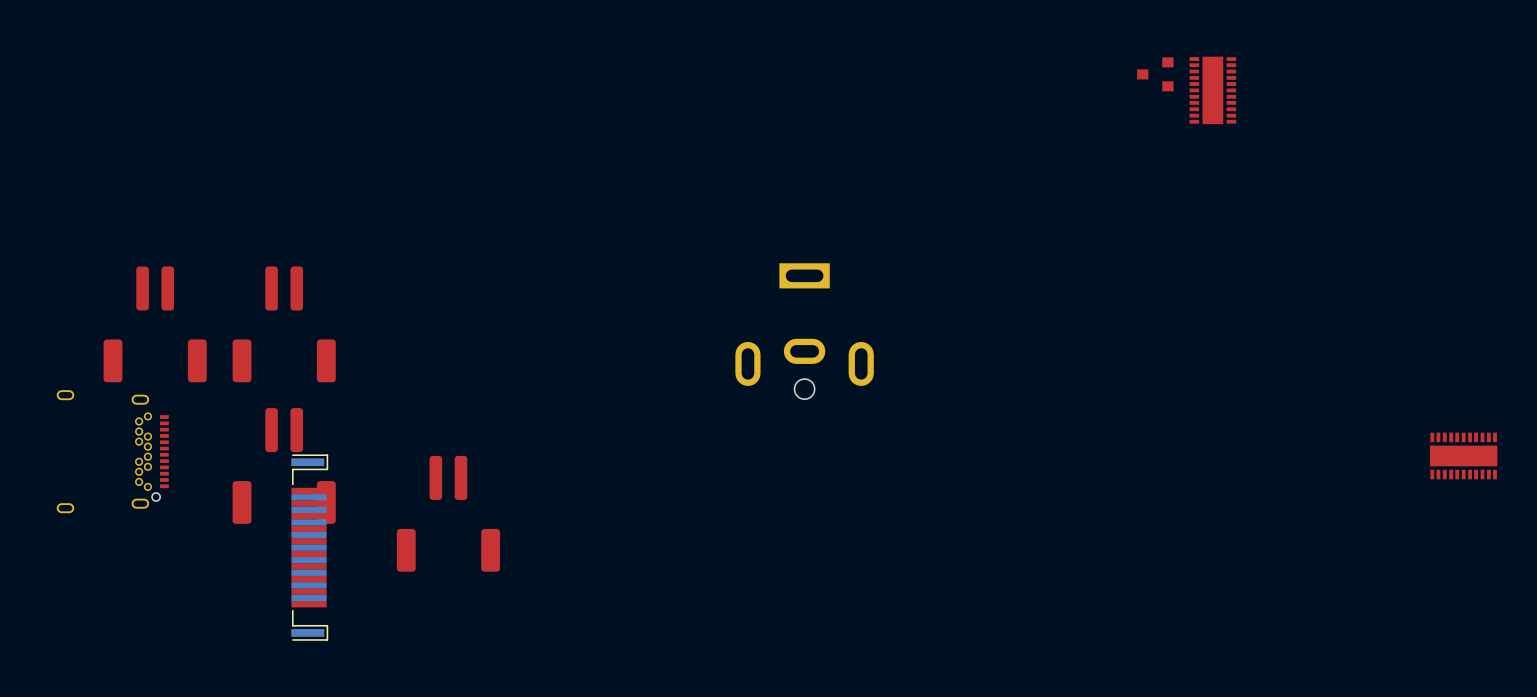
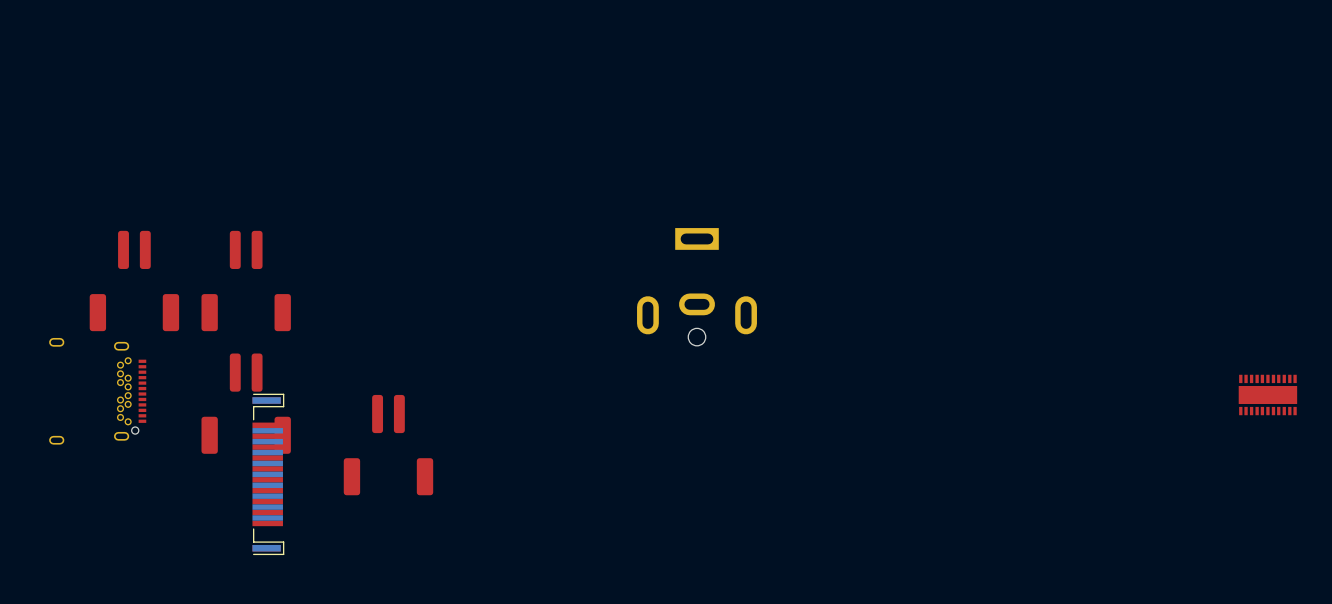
part: (1155, 74) -> none
part: (1212, 90) -> none

